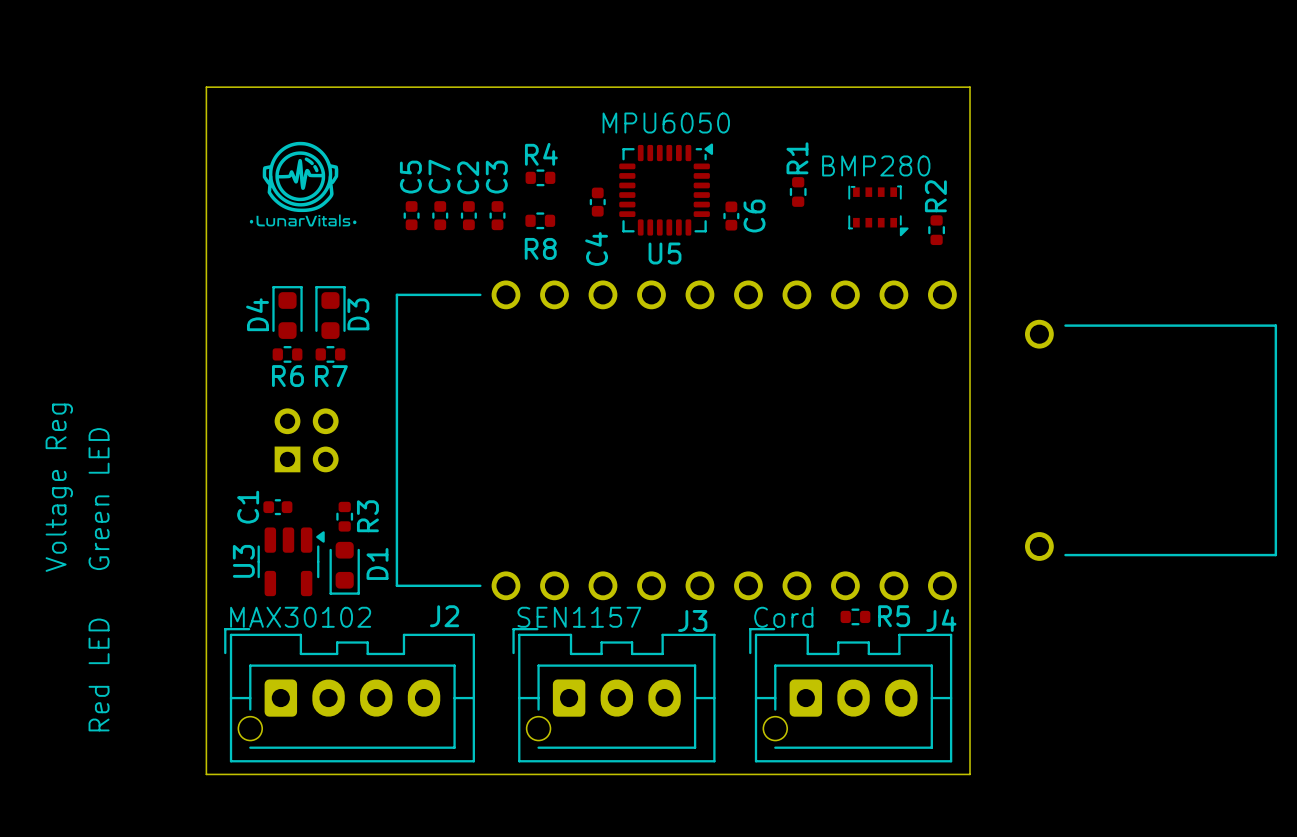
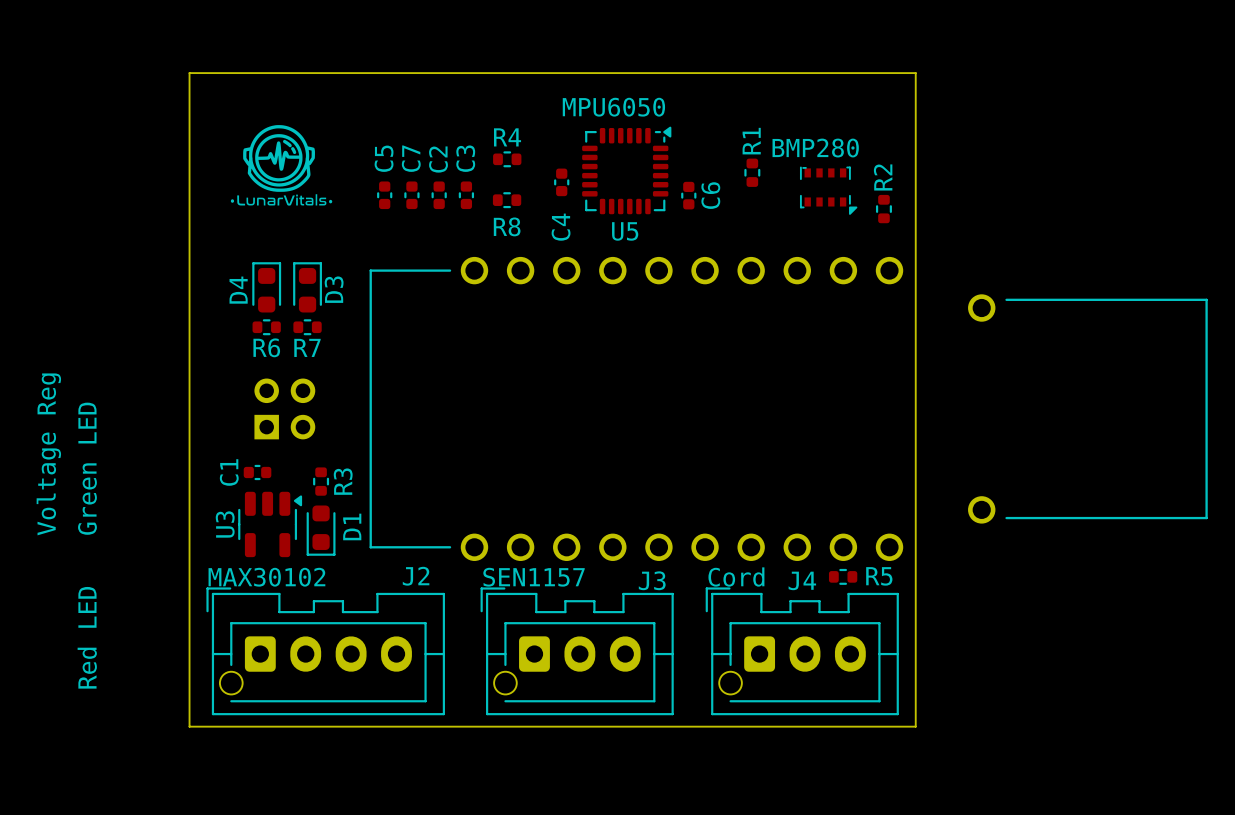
R5 position: (855, 616) -> (843, 576)
J4 name position: J4 (941, 620) -> J4 (802, 580)

